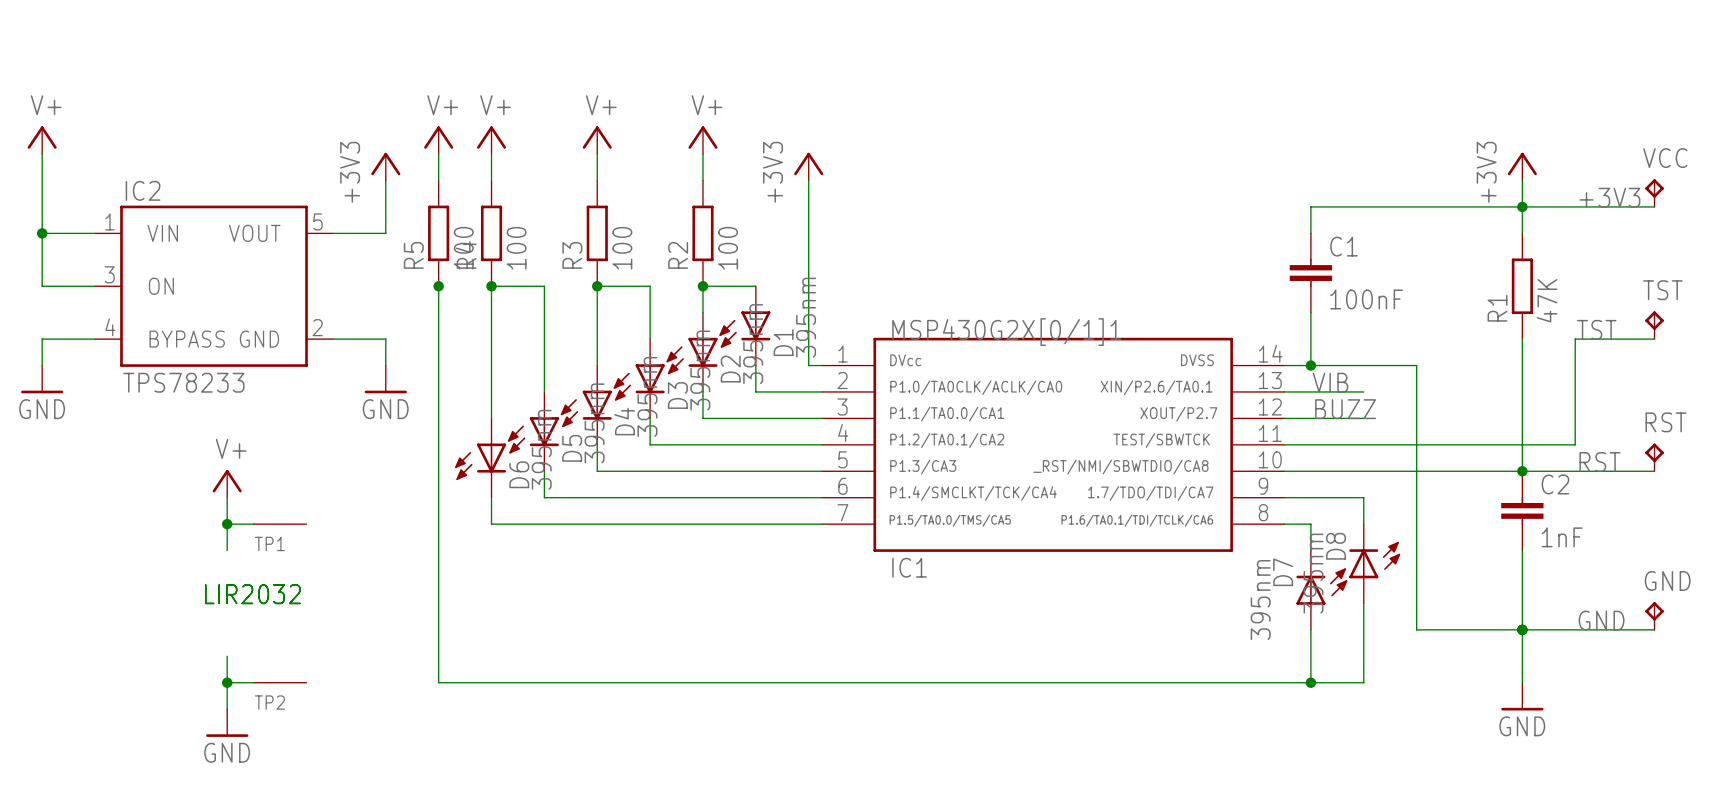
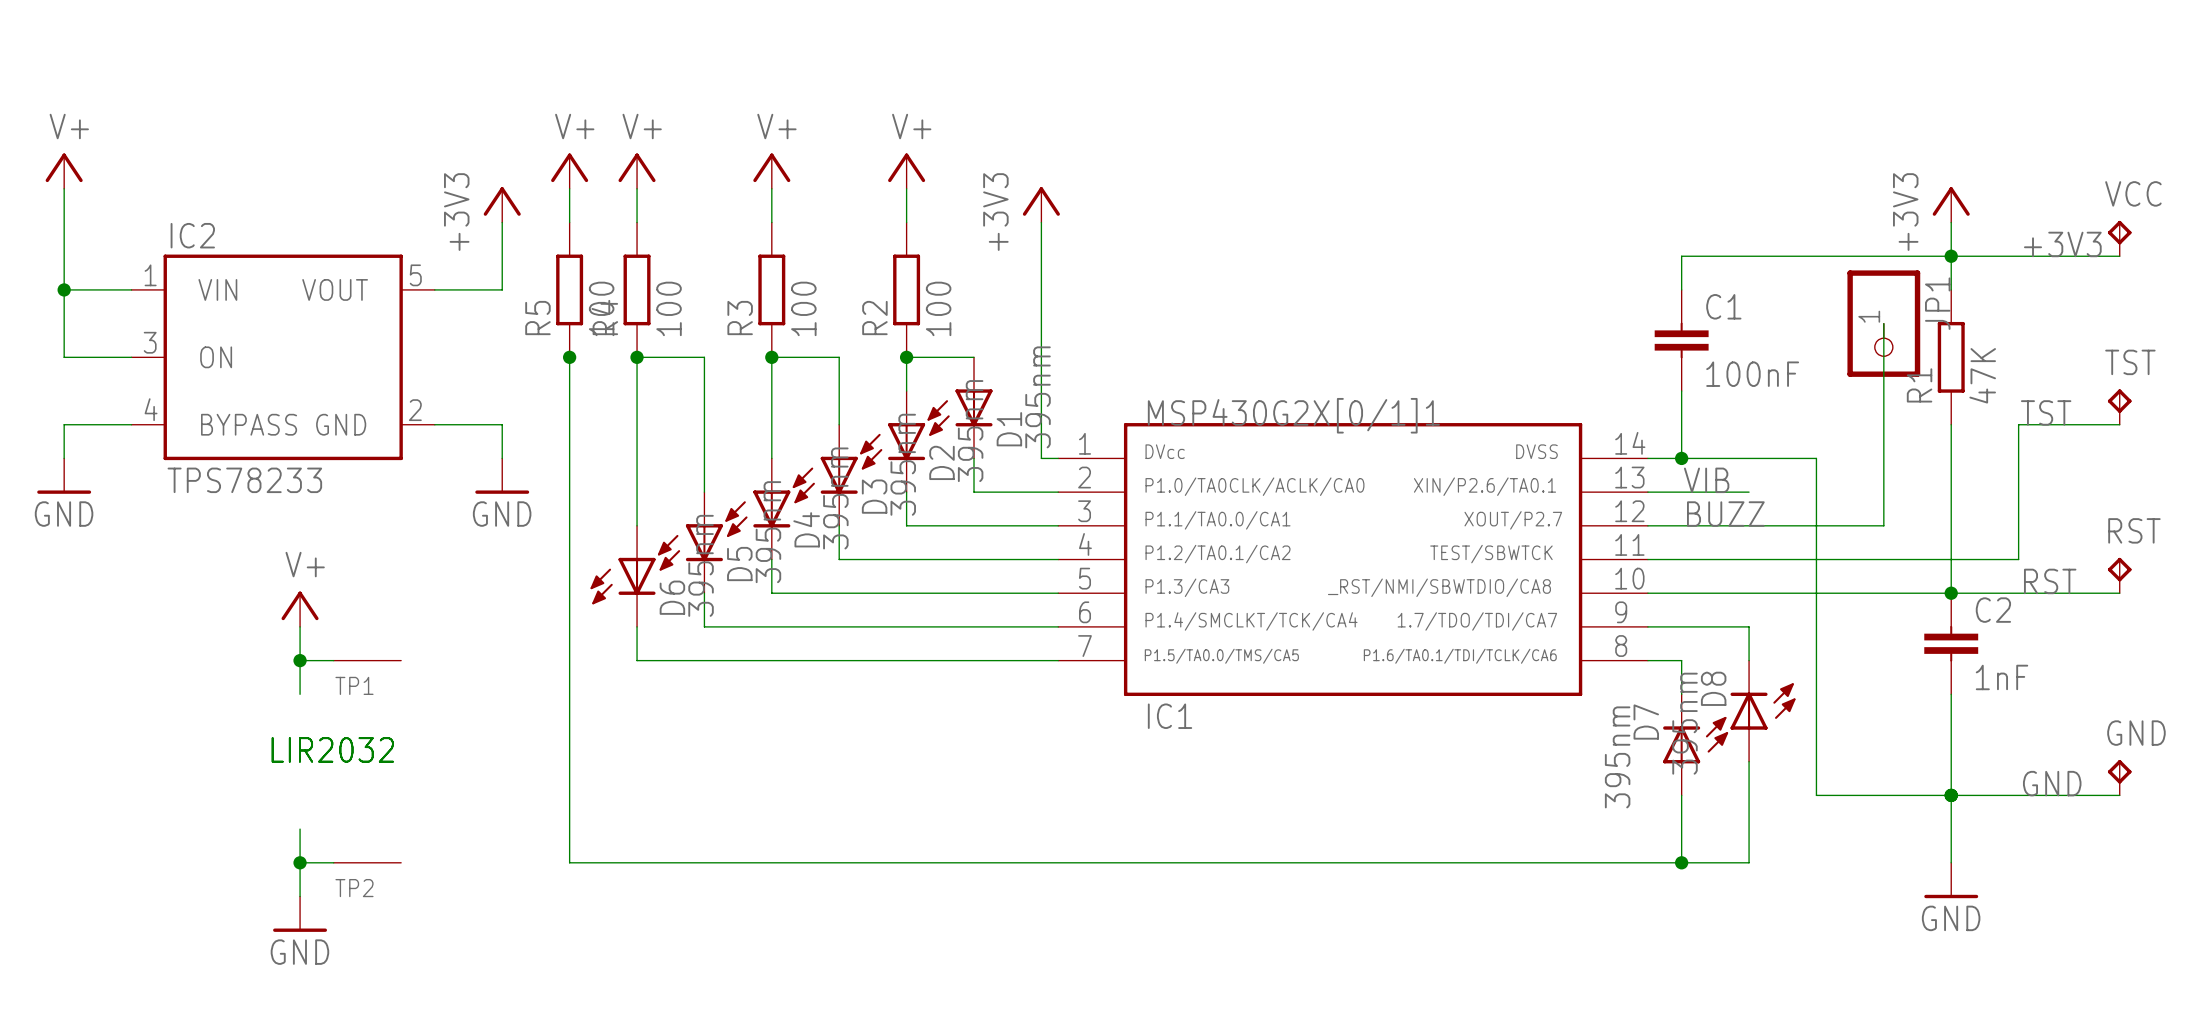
wire: none -> (1883, 323) (1883, 525) (1749, 525)
JP1: none -> (1883, 323)

